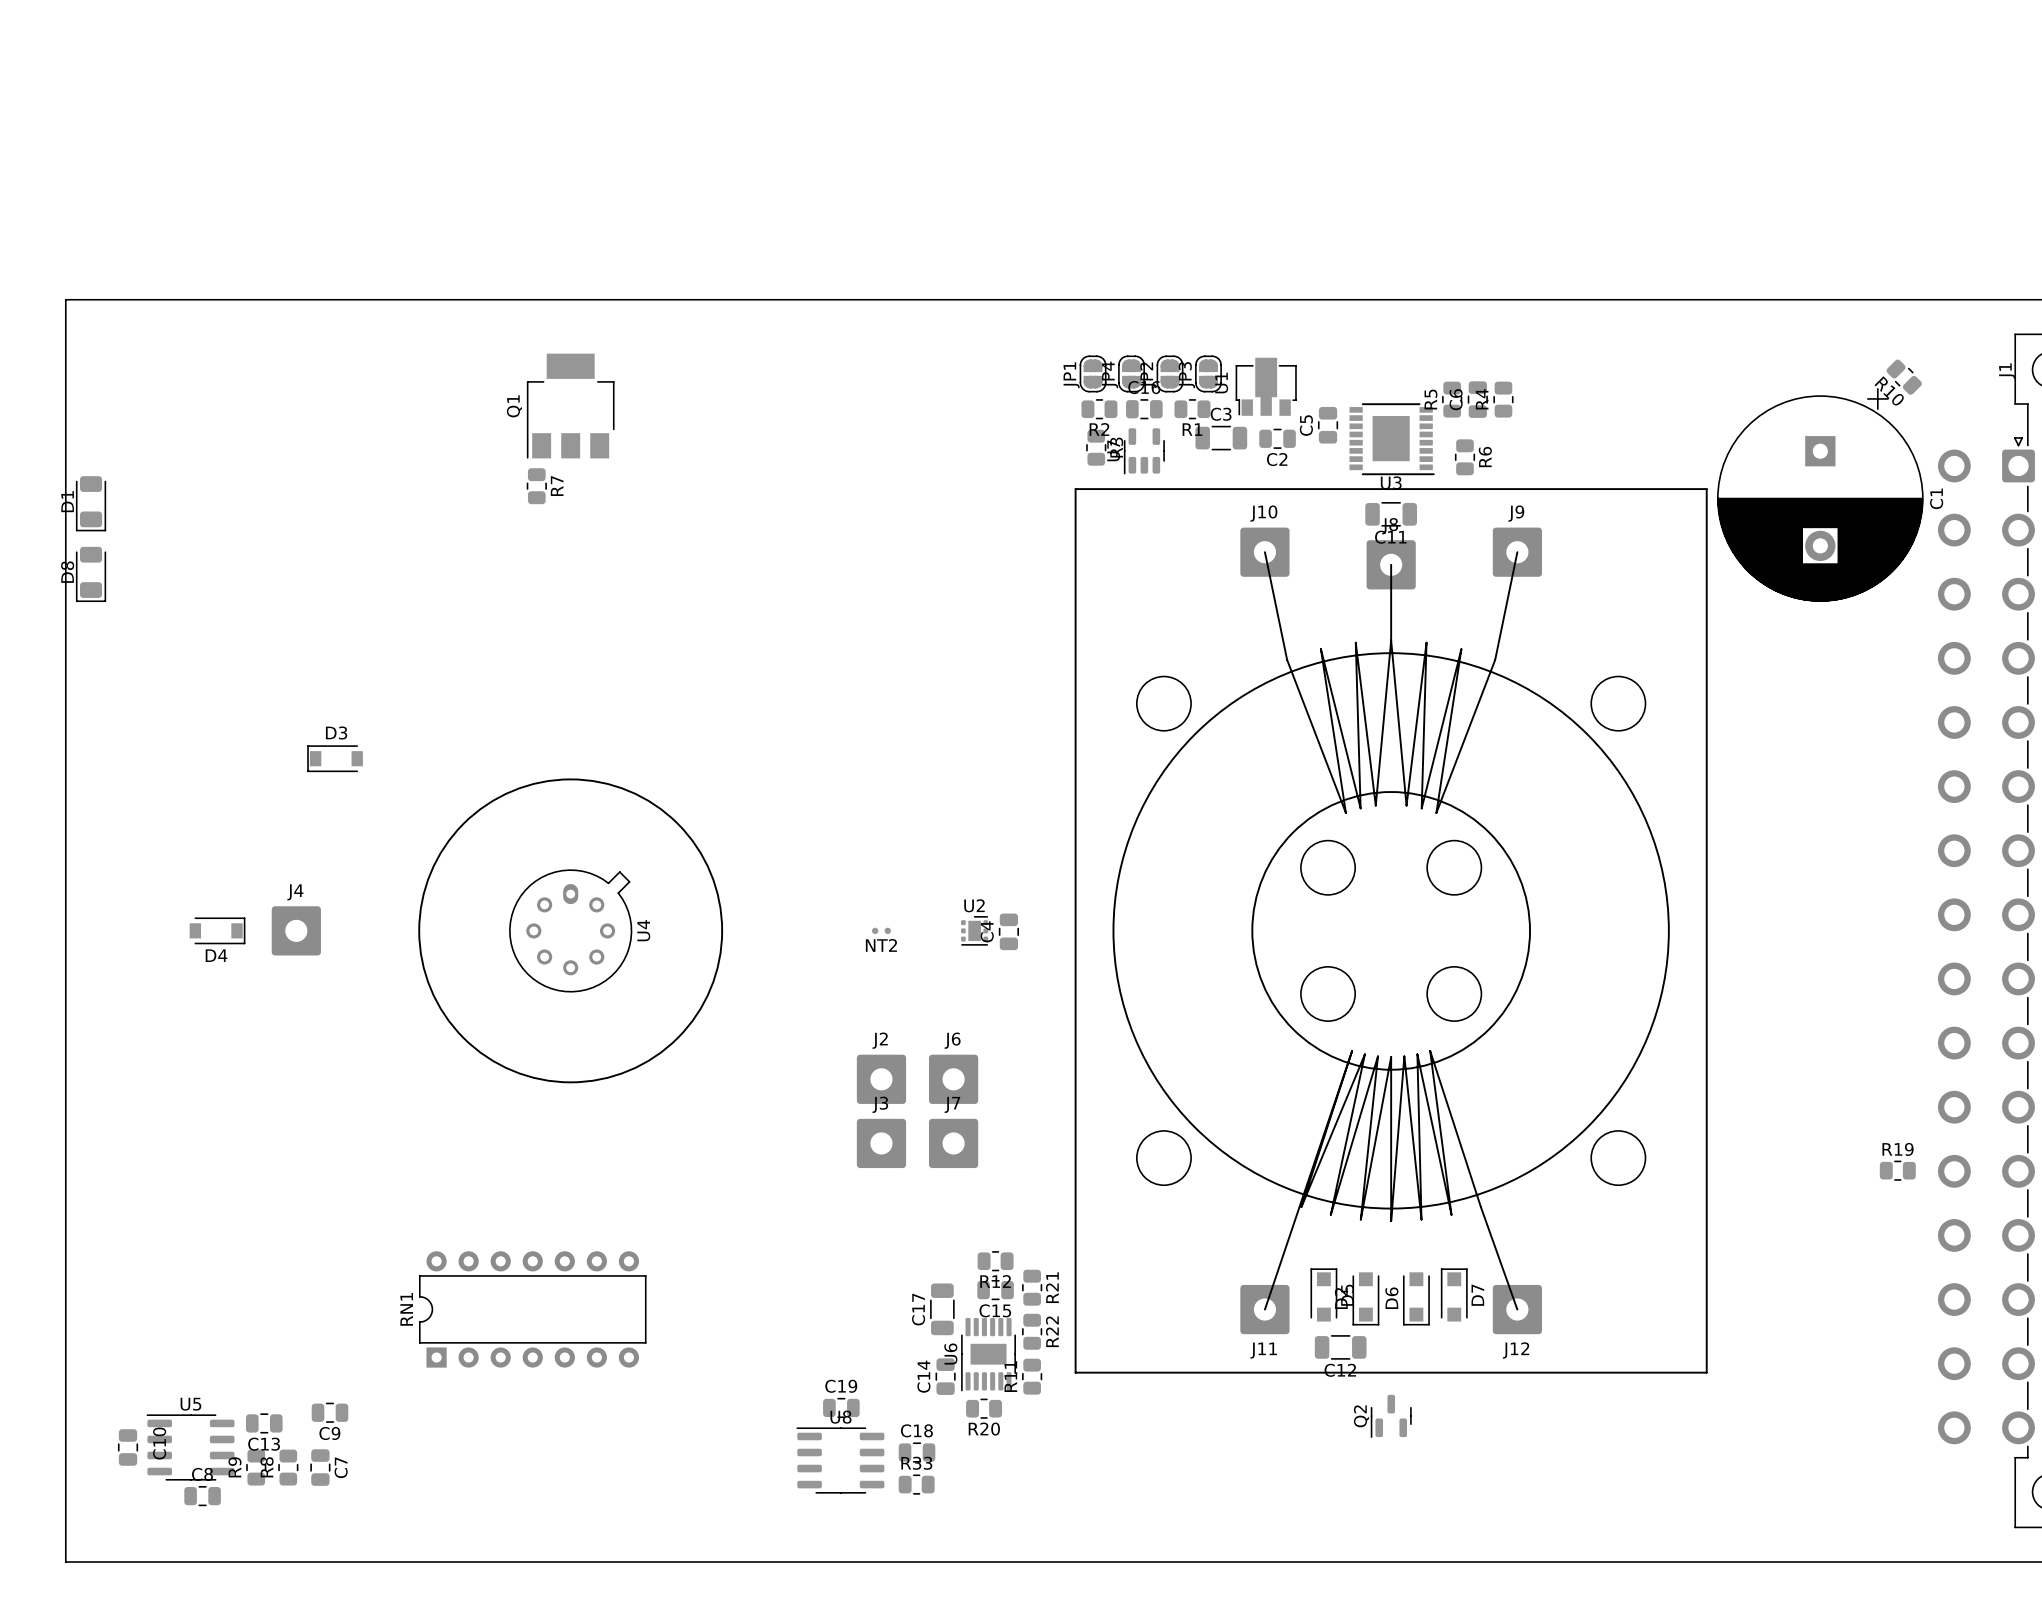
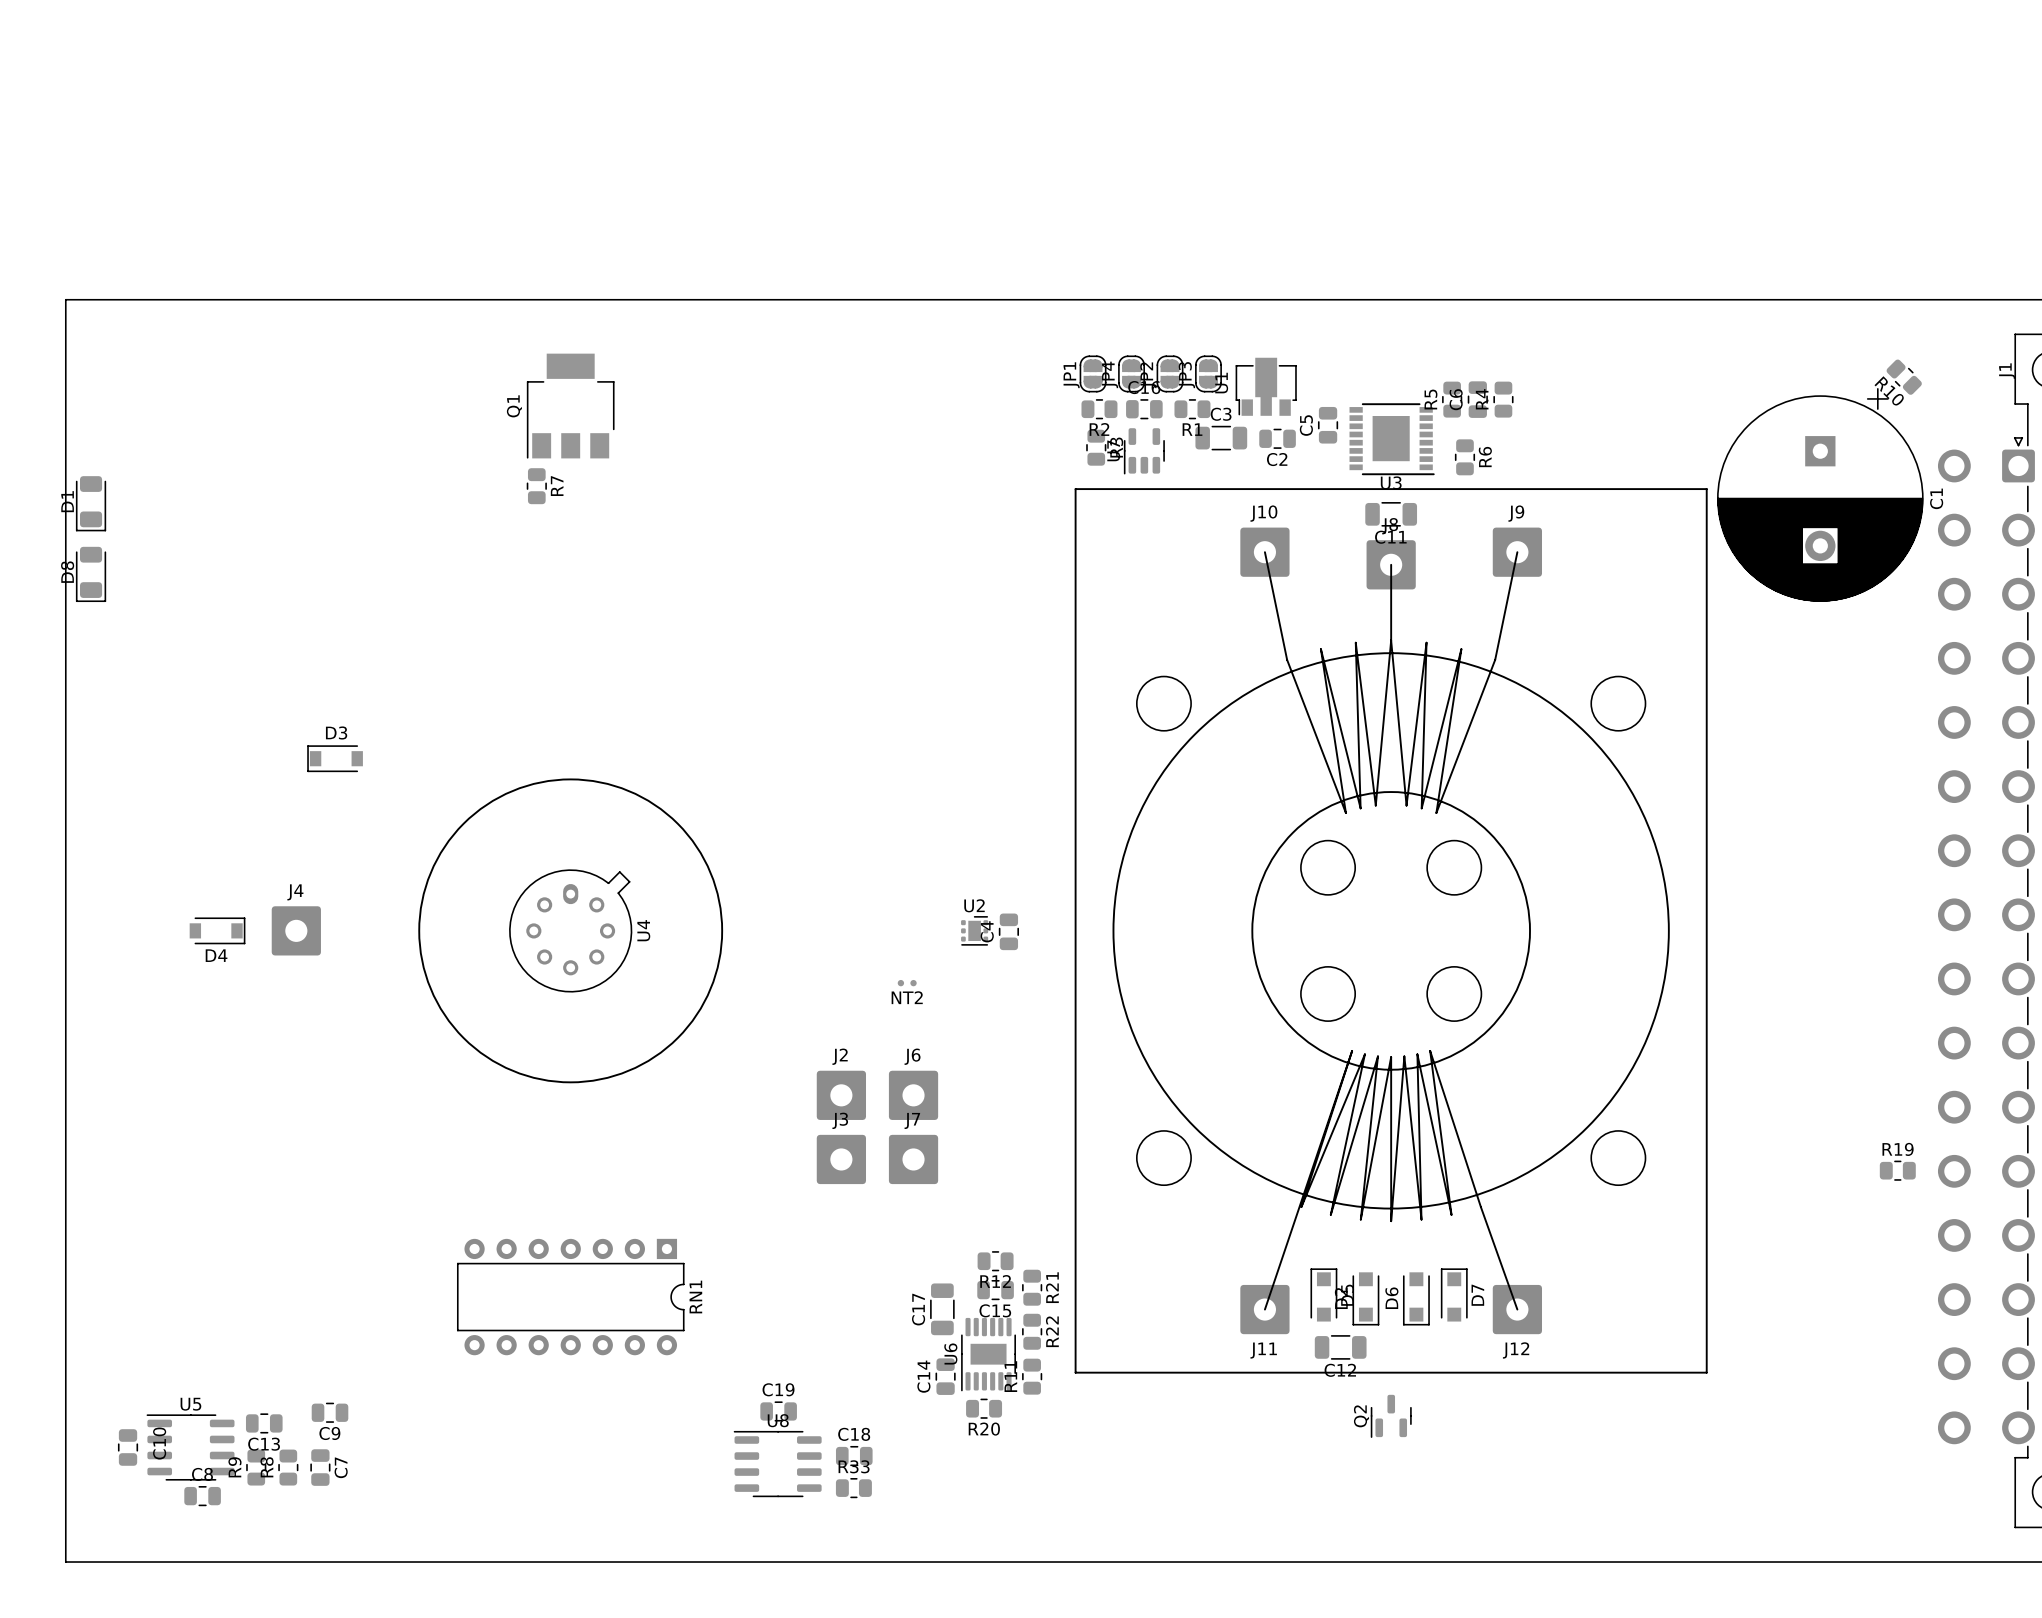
NT2 position: (881, 930) -> (907, 983)
J2 position: (881, 1079) -> (841, 1095)
J6 position: (953, 1079) -> (913, 1095)
J3 position: (881, 1143) -> (841, 1159)
J7 position: (953, 1143) -> (913, 1159)
RN1 rotation: 0° (532, 1309) -> 180° (570, 1297)
C19 position: (841, 1407) -> (778, 1411)
C18 position: (917, 1452) -> (854, 1456)
U8 position: (840, 1460) -> (777, 1464)
R33 position: (916, 1484) -> (853, 1488)

